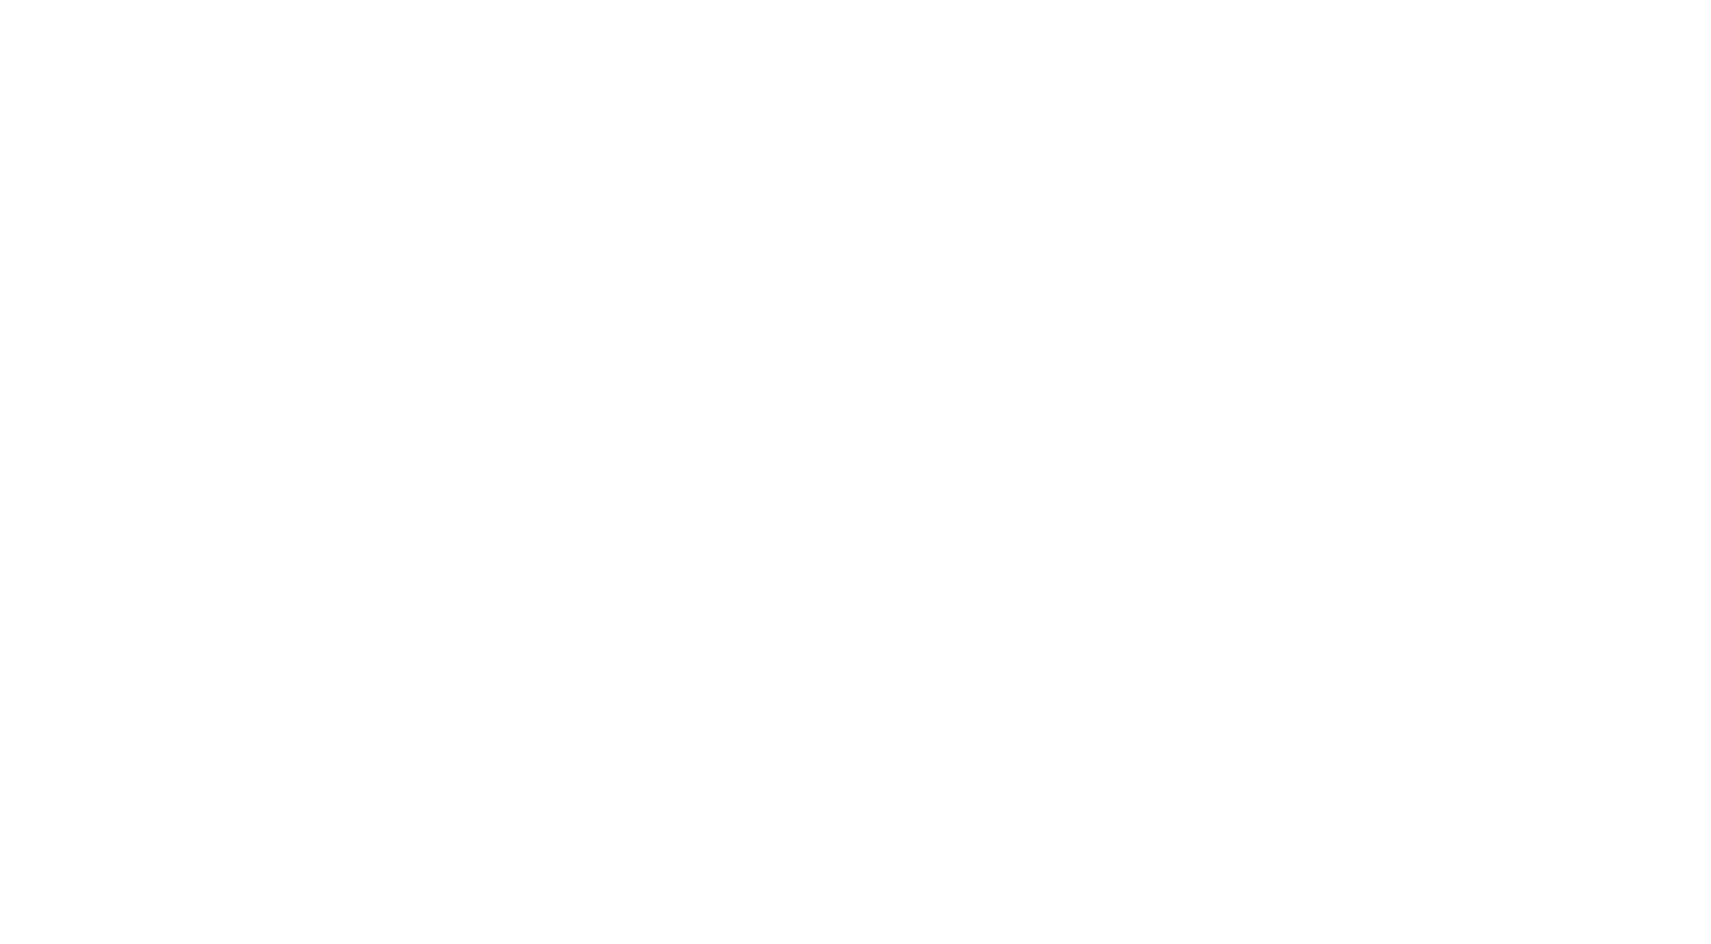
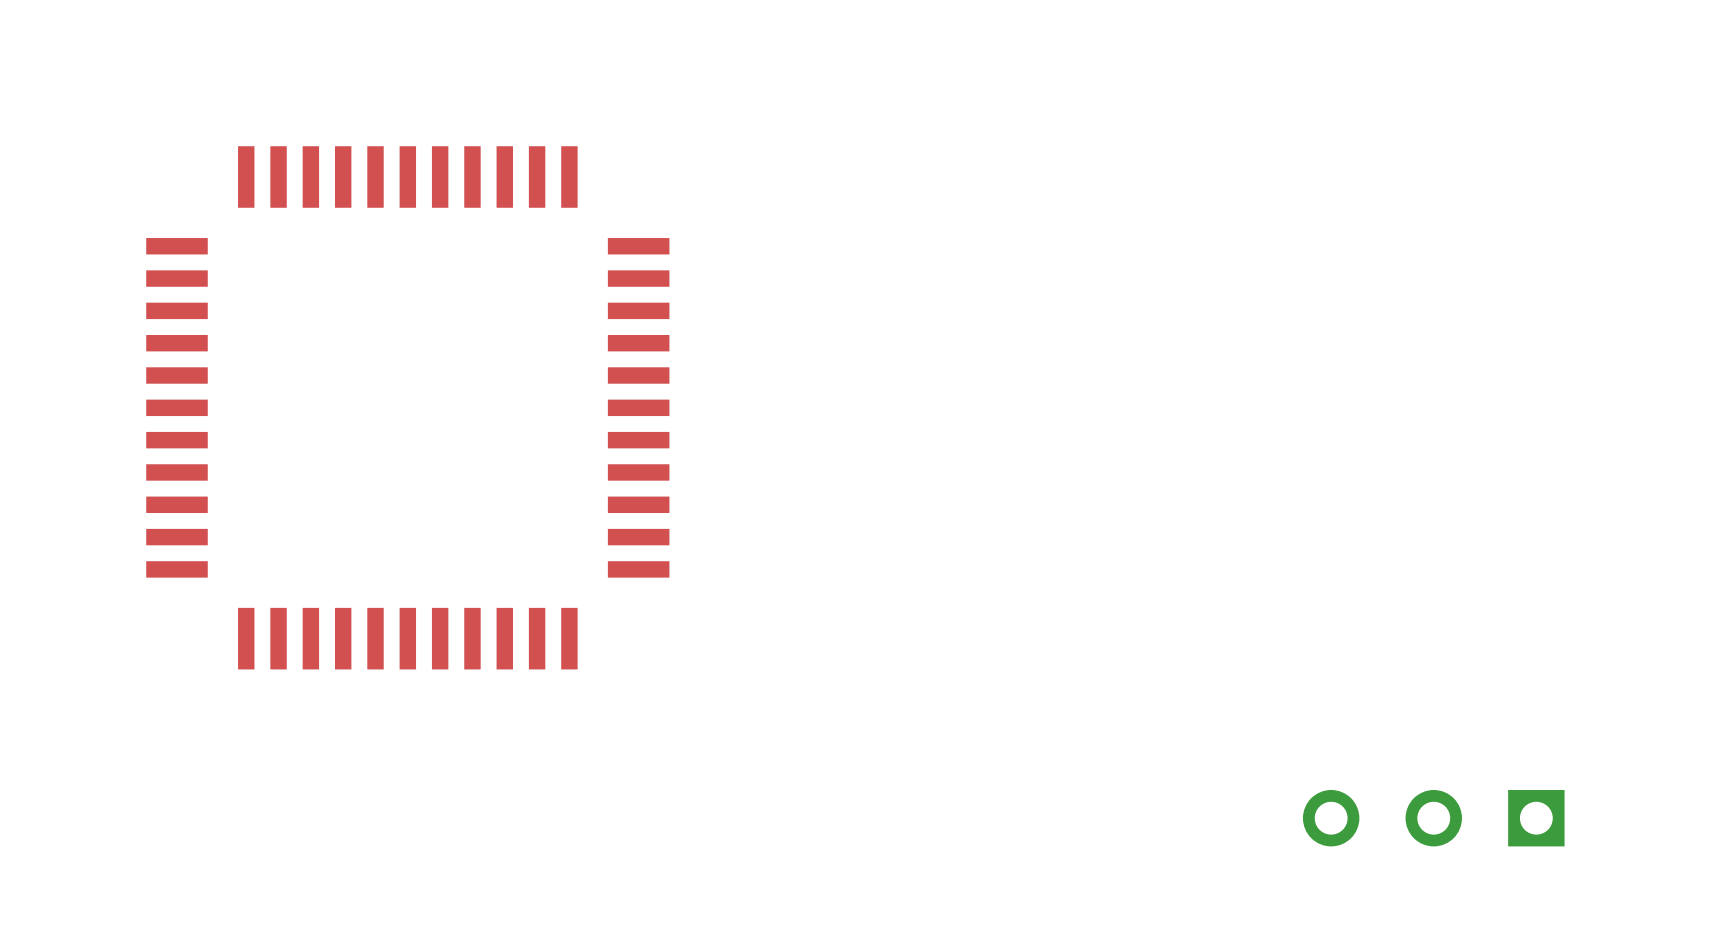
part: none -> (407, 407)
part: none -> (1433, 818)

